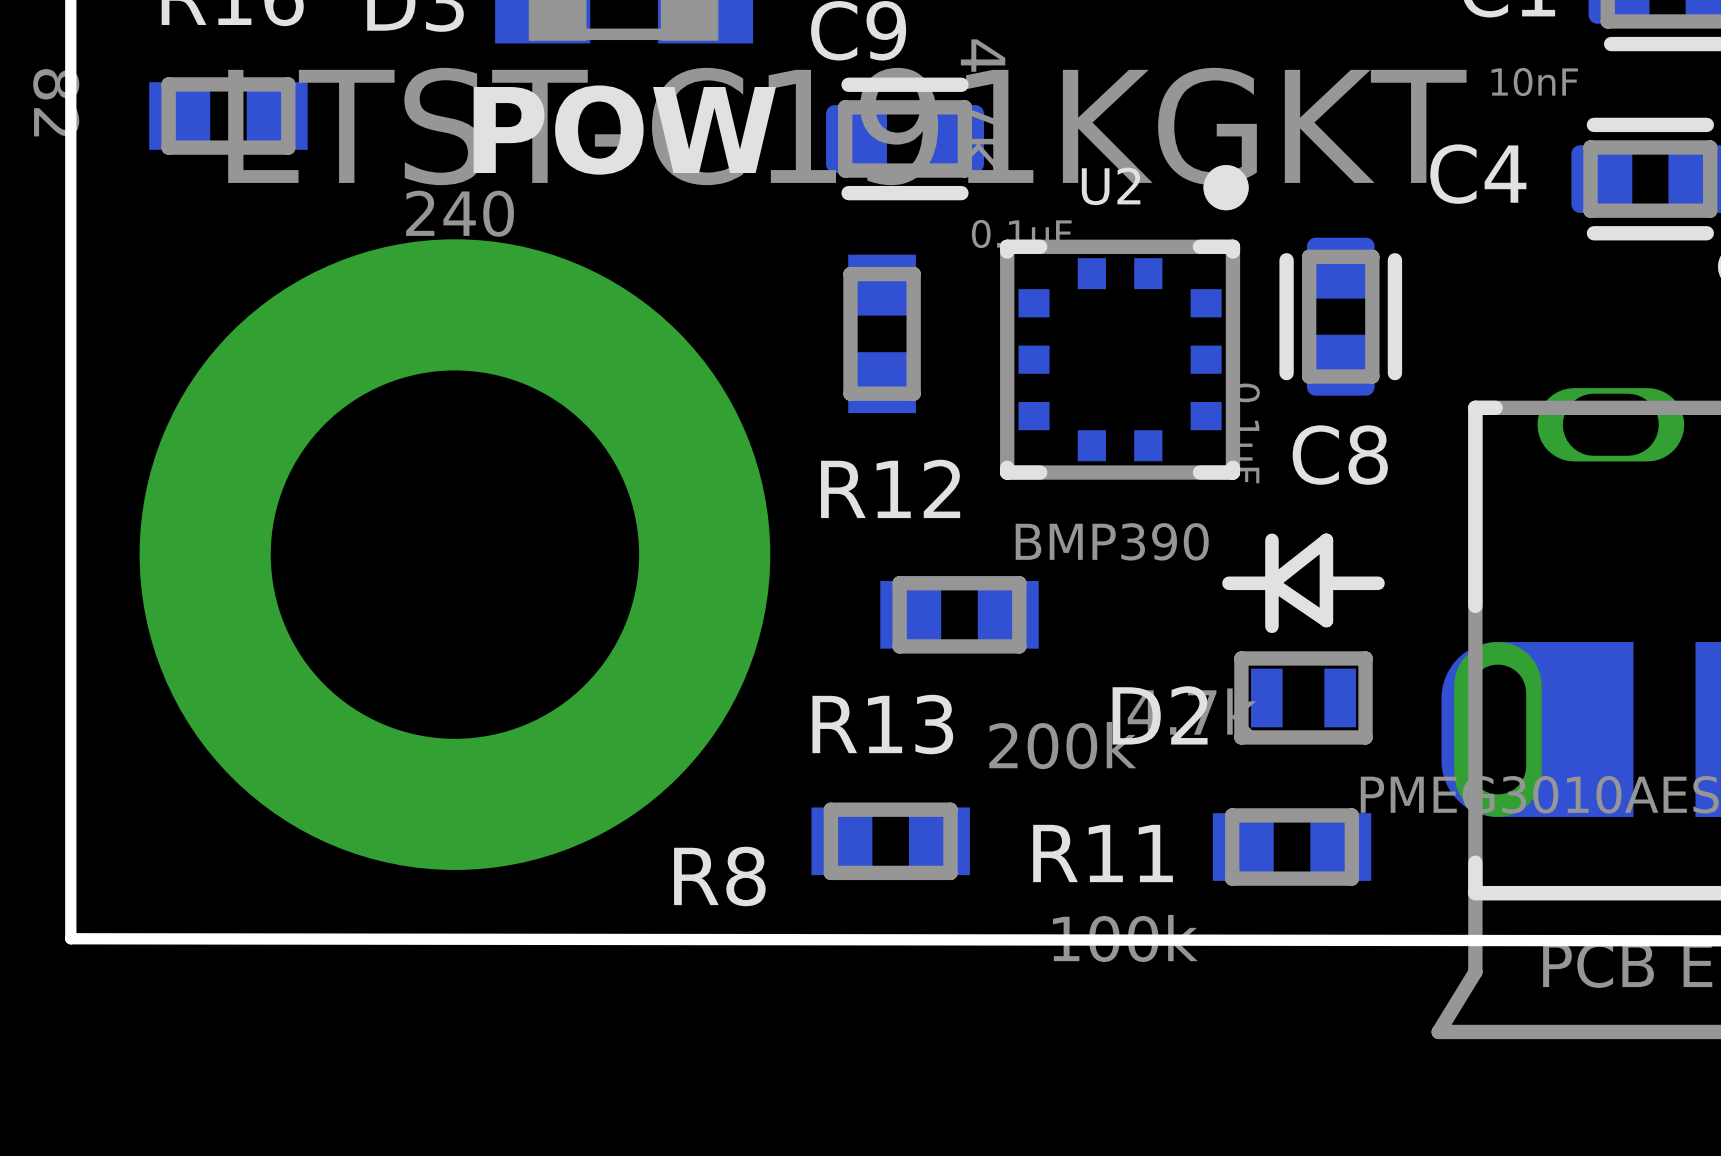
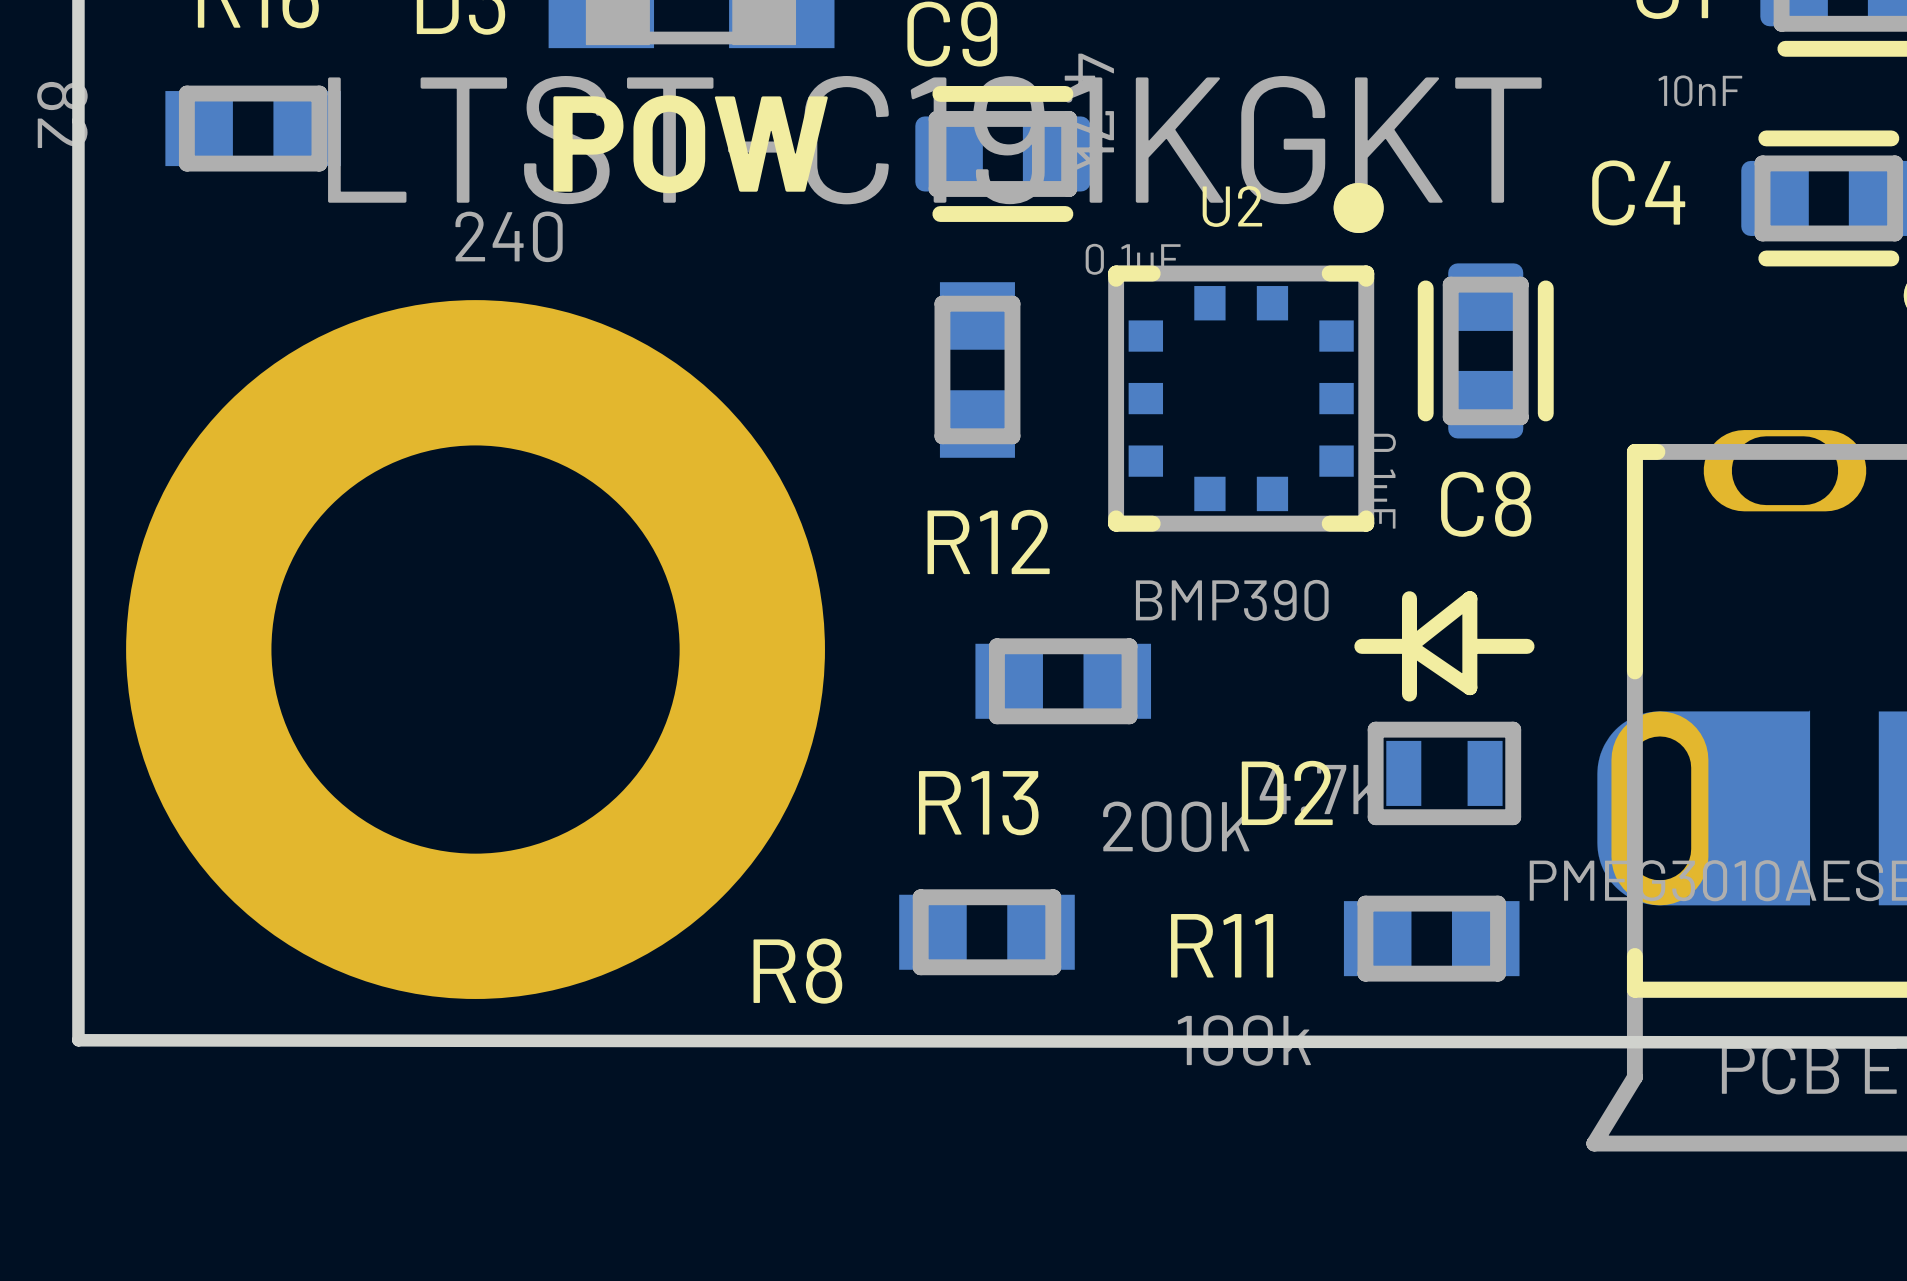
part position: (454, 554) -> (475, 649)

